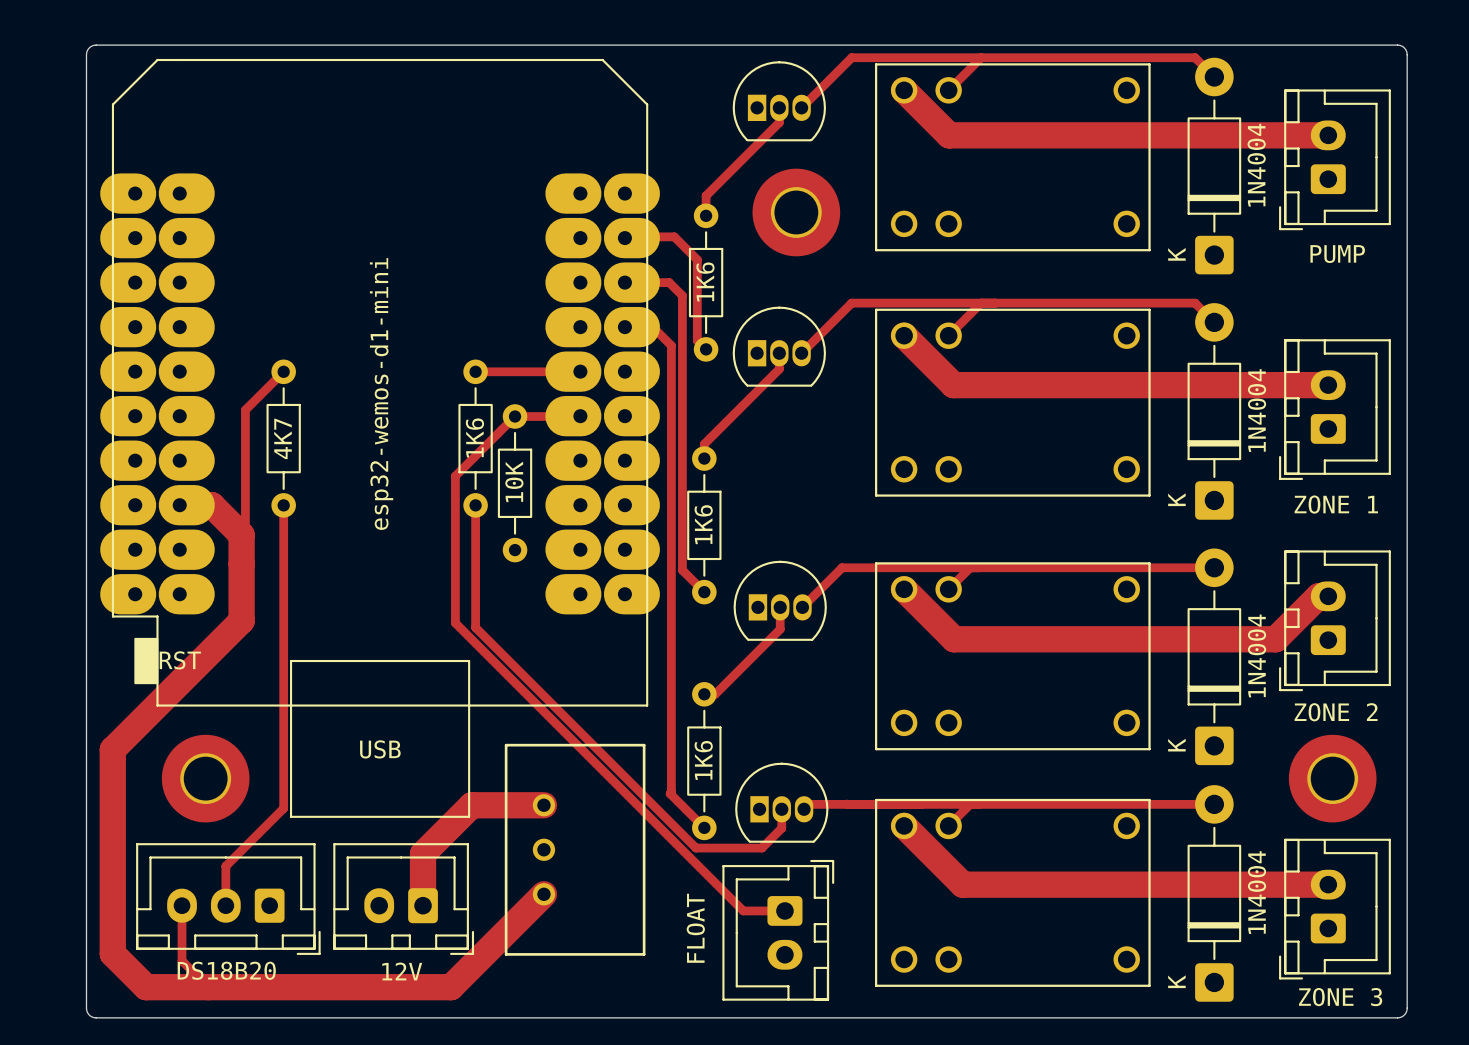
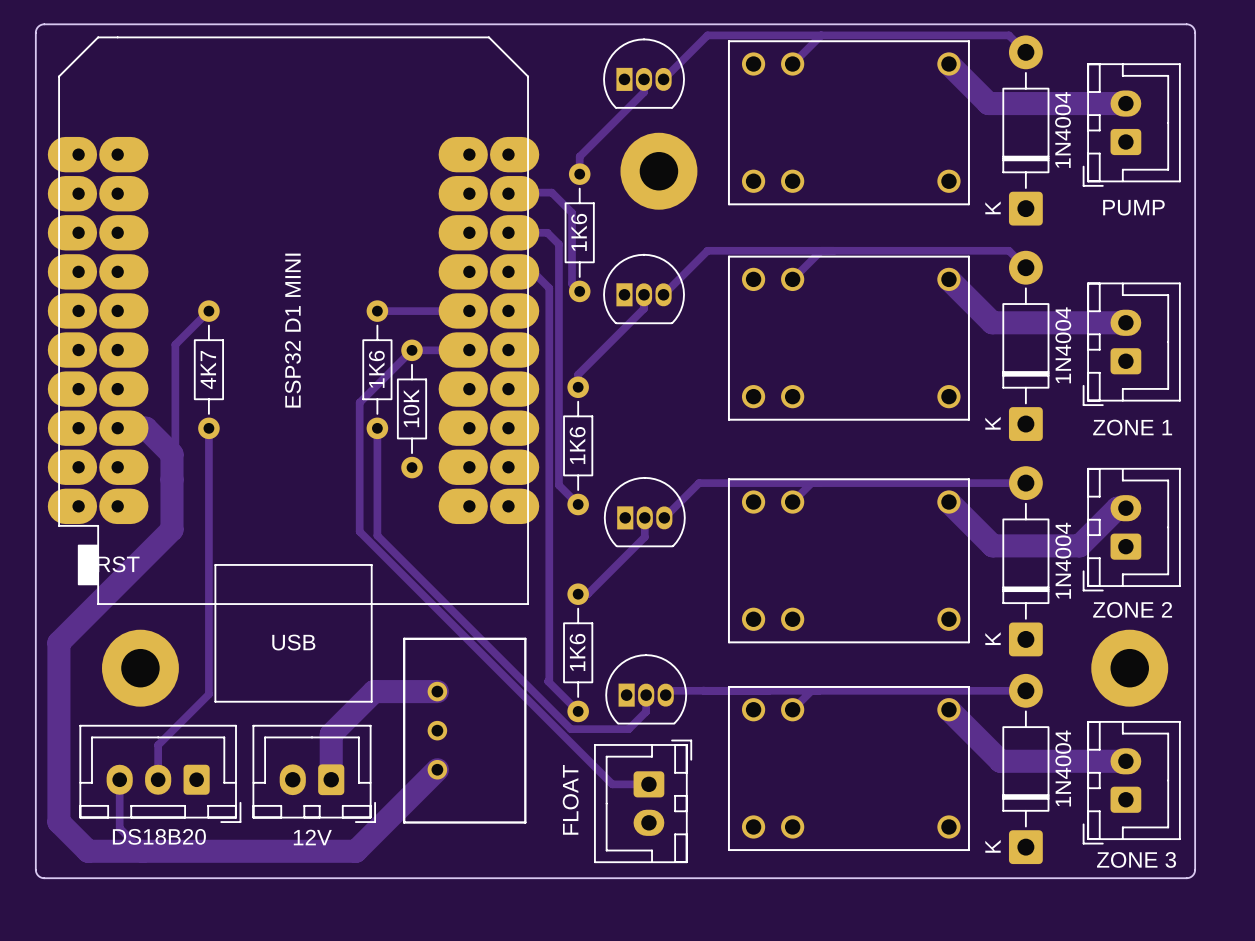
track: (904, 90) (949, 135) (1171, 135) -> (948, 64) (988, 103)
track: (904, 335) (953, 385) (1176, 385) -> (948, 279) (992, 322)
part value: esp32-wemos-d1-mini (381, 394) -> ESP32 D1 MINI (292, 330)
track: (904, 589) (954, 639) (1176, 639) -> (948, 502) (992, 545)
track: (904, 825) (962, 884) (1185, 884) -> (948, 709) (1000, 761)

